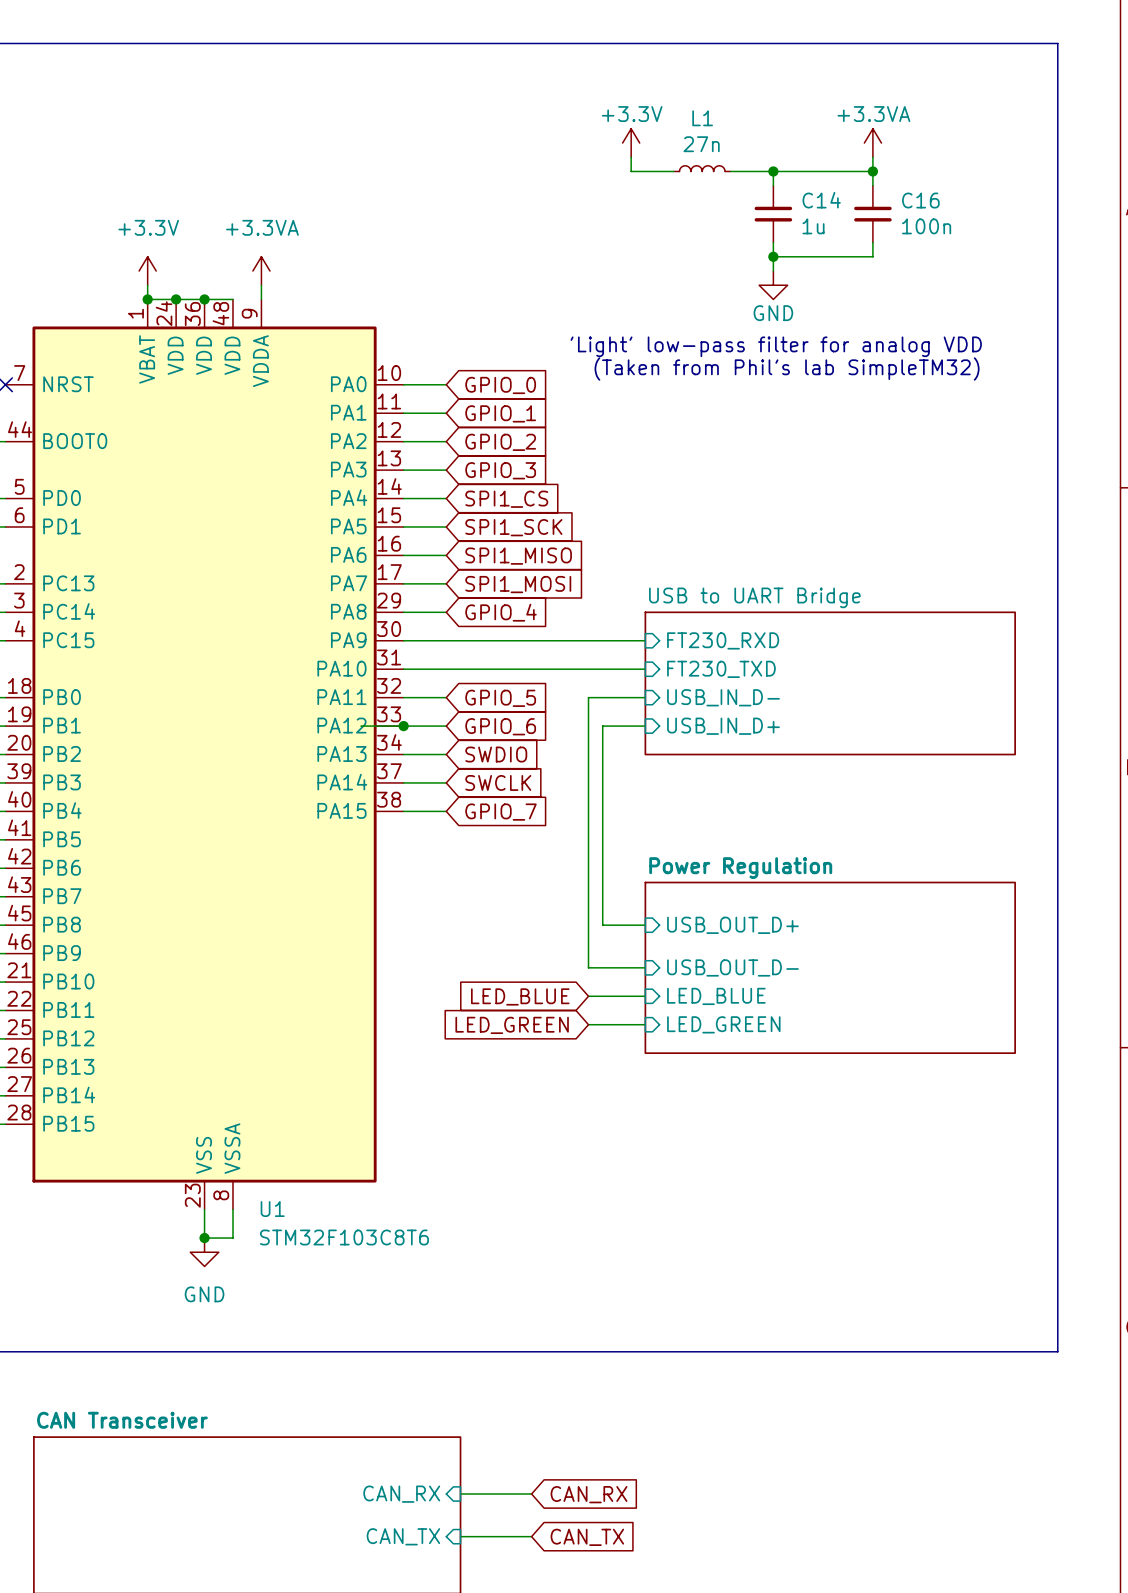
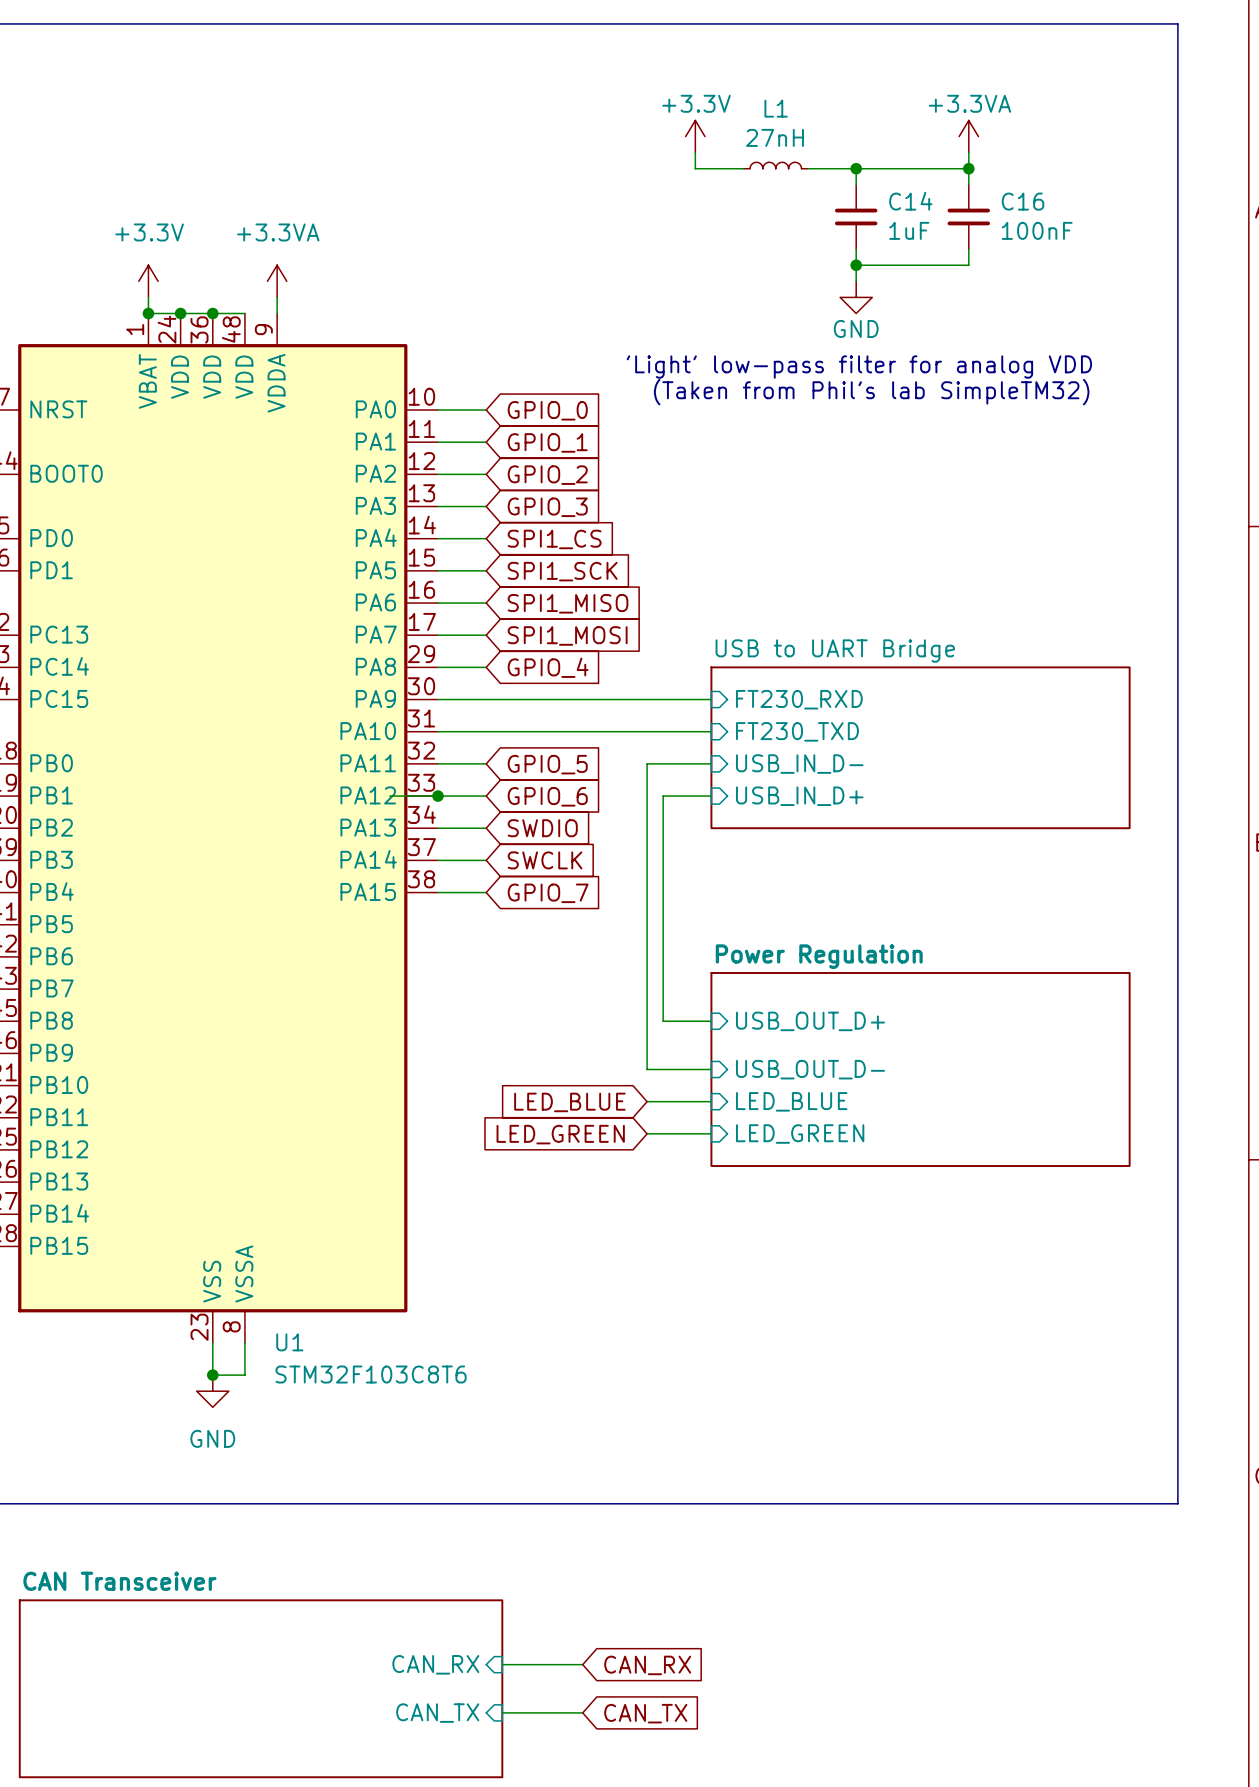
L1 value: 27n (701, 144) -> 27nH (775, 137)
C14 value: 1u (813, 226) -> 1uF (909, 230)
C16 value: 100n (926, 226) -> 100nF (1037, 230)

